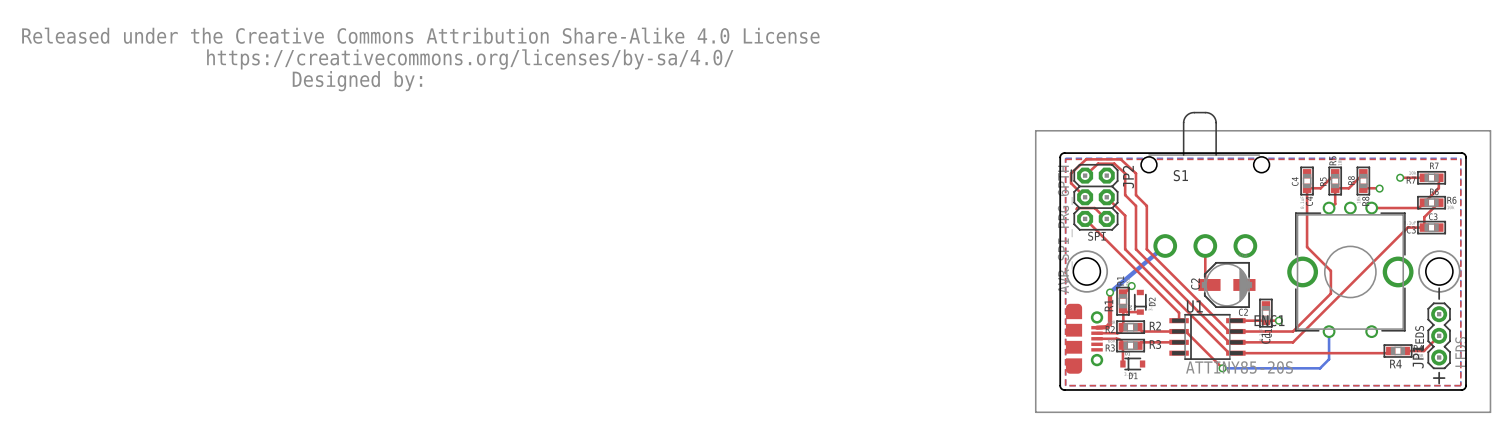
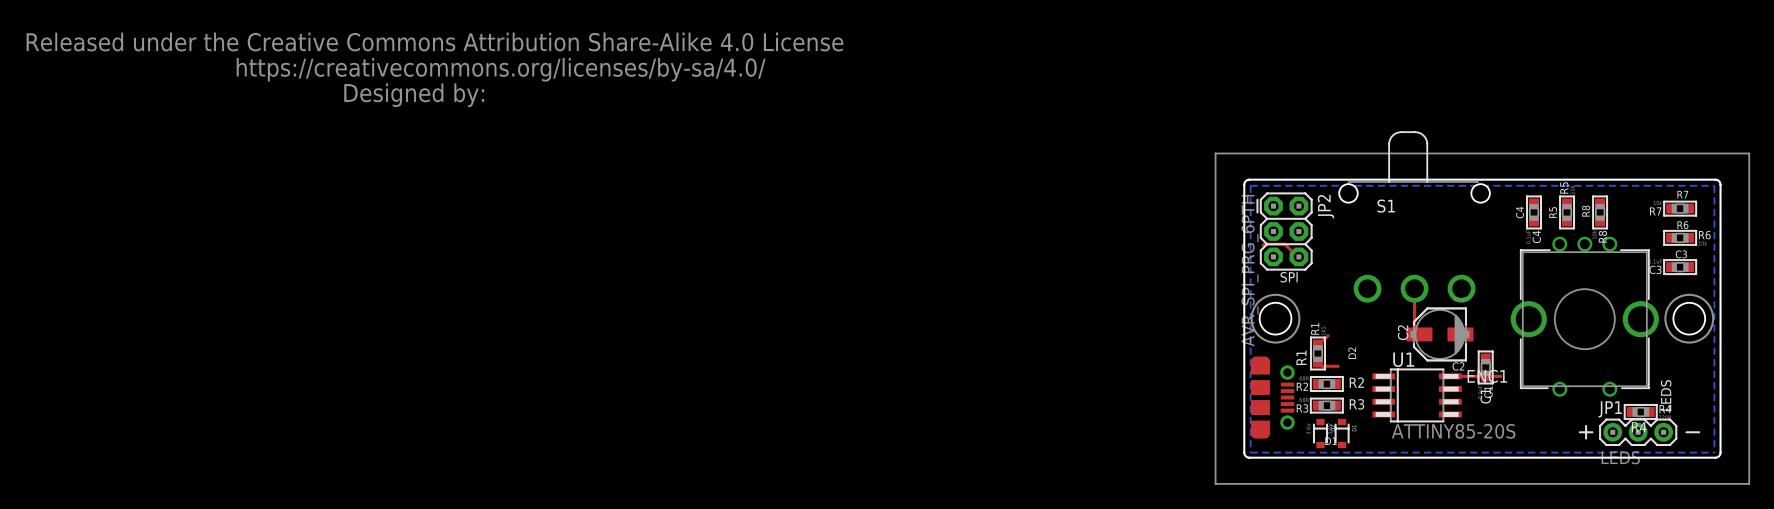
top zone outline: (1065, 159) (1460, 159) (1460, 385) (1065, 385) (1065, 159) -> none
top track: (1335, 173) (1320, 188) (1307, 188) (1307, 247) (1330, 270) (1330, 293) (1292, 331) (1229, 331) (1146, 249) (1146, 205) (1136, 195) (1136, 173) (1120, 159) (1086, 159) (1071, 173) (1071, 183) (1085, 197) -> none
top track: (1363, 173) (1348, 188) (1335, 188) (1335, 204) (1329, 208) -> none
top track: (1085, 175) (1098, 163) (1114, 163) (1125, 173) (1125, 195) (1136, 205) (1136, 249) (1229, 342) (1292, 342) (1407, 227) (1424, 227) (1424, 217) (1438, 202) -> none
top track: (1400, 177) (1424, 177) -> none
via: (1400, 177) -> none
top track: (1438, 177) (1438, 188) (1418, 208) (1371, 208) -> none
top track: (1363, 188) (1379, 188) -> none
via: (1379, 188) -> none
top track: (1106, 197) (1125, 215) (1125, 249) (1229, 353) (1388, 353) (1390, 351) -> none
top track: (1085, 218) (1179, 312) (1179, 320) -> none
bottom track: (1165, 245) (1110, 292) -> none
via: (1131, 286) -> none
line: (1439, 288) (1439, 299) -> none
top track: (1110, 292) (1110, 323) (1106, 327) (1097, 327) -> none
via: (1110, 292) -> none
part rotation: 0° (1140, 302) -> 180° (1320, 433)
part position: (1140, 302) -> (1320, 433)
top track: (1123, 308) (1121, 331) (1097, 333) -> none
via: (1278, 320) -> none
top track: (1137, 327) (1142, 331) (1185, 331) (1222, 368) -> none
bottom track: (1329, 331) (1329, 359) (1320, 368) (1222, 368) -> none
top track: (1439, 335) (1424, 351) (1405, 351) -> none
JP1 rotation: 0° (1439, 335) -> 90° clockwise (1638, 432)
JP1 position: (1439, 335) -> (1638, 432)
top track: (1097, 338) (1117, 338) (1121, 340) (1123, 344) (1122, 364) -> none
top track: (1179, 342) (1141, 342) (1137, 345) -> none
part rotation: 0° (1132, 364) -> 90° clockwise (1342, 433)
via: (1222, 368) -> none
line: none -> (1686, 432) (1699, 432)
line: (1439, 372) (1439, 383) -> (1586, 425) (1586, 438)
line: (1433, 378) (1444, 378) -> (1579, 432) (1592, 432)

